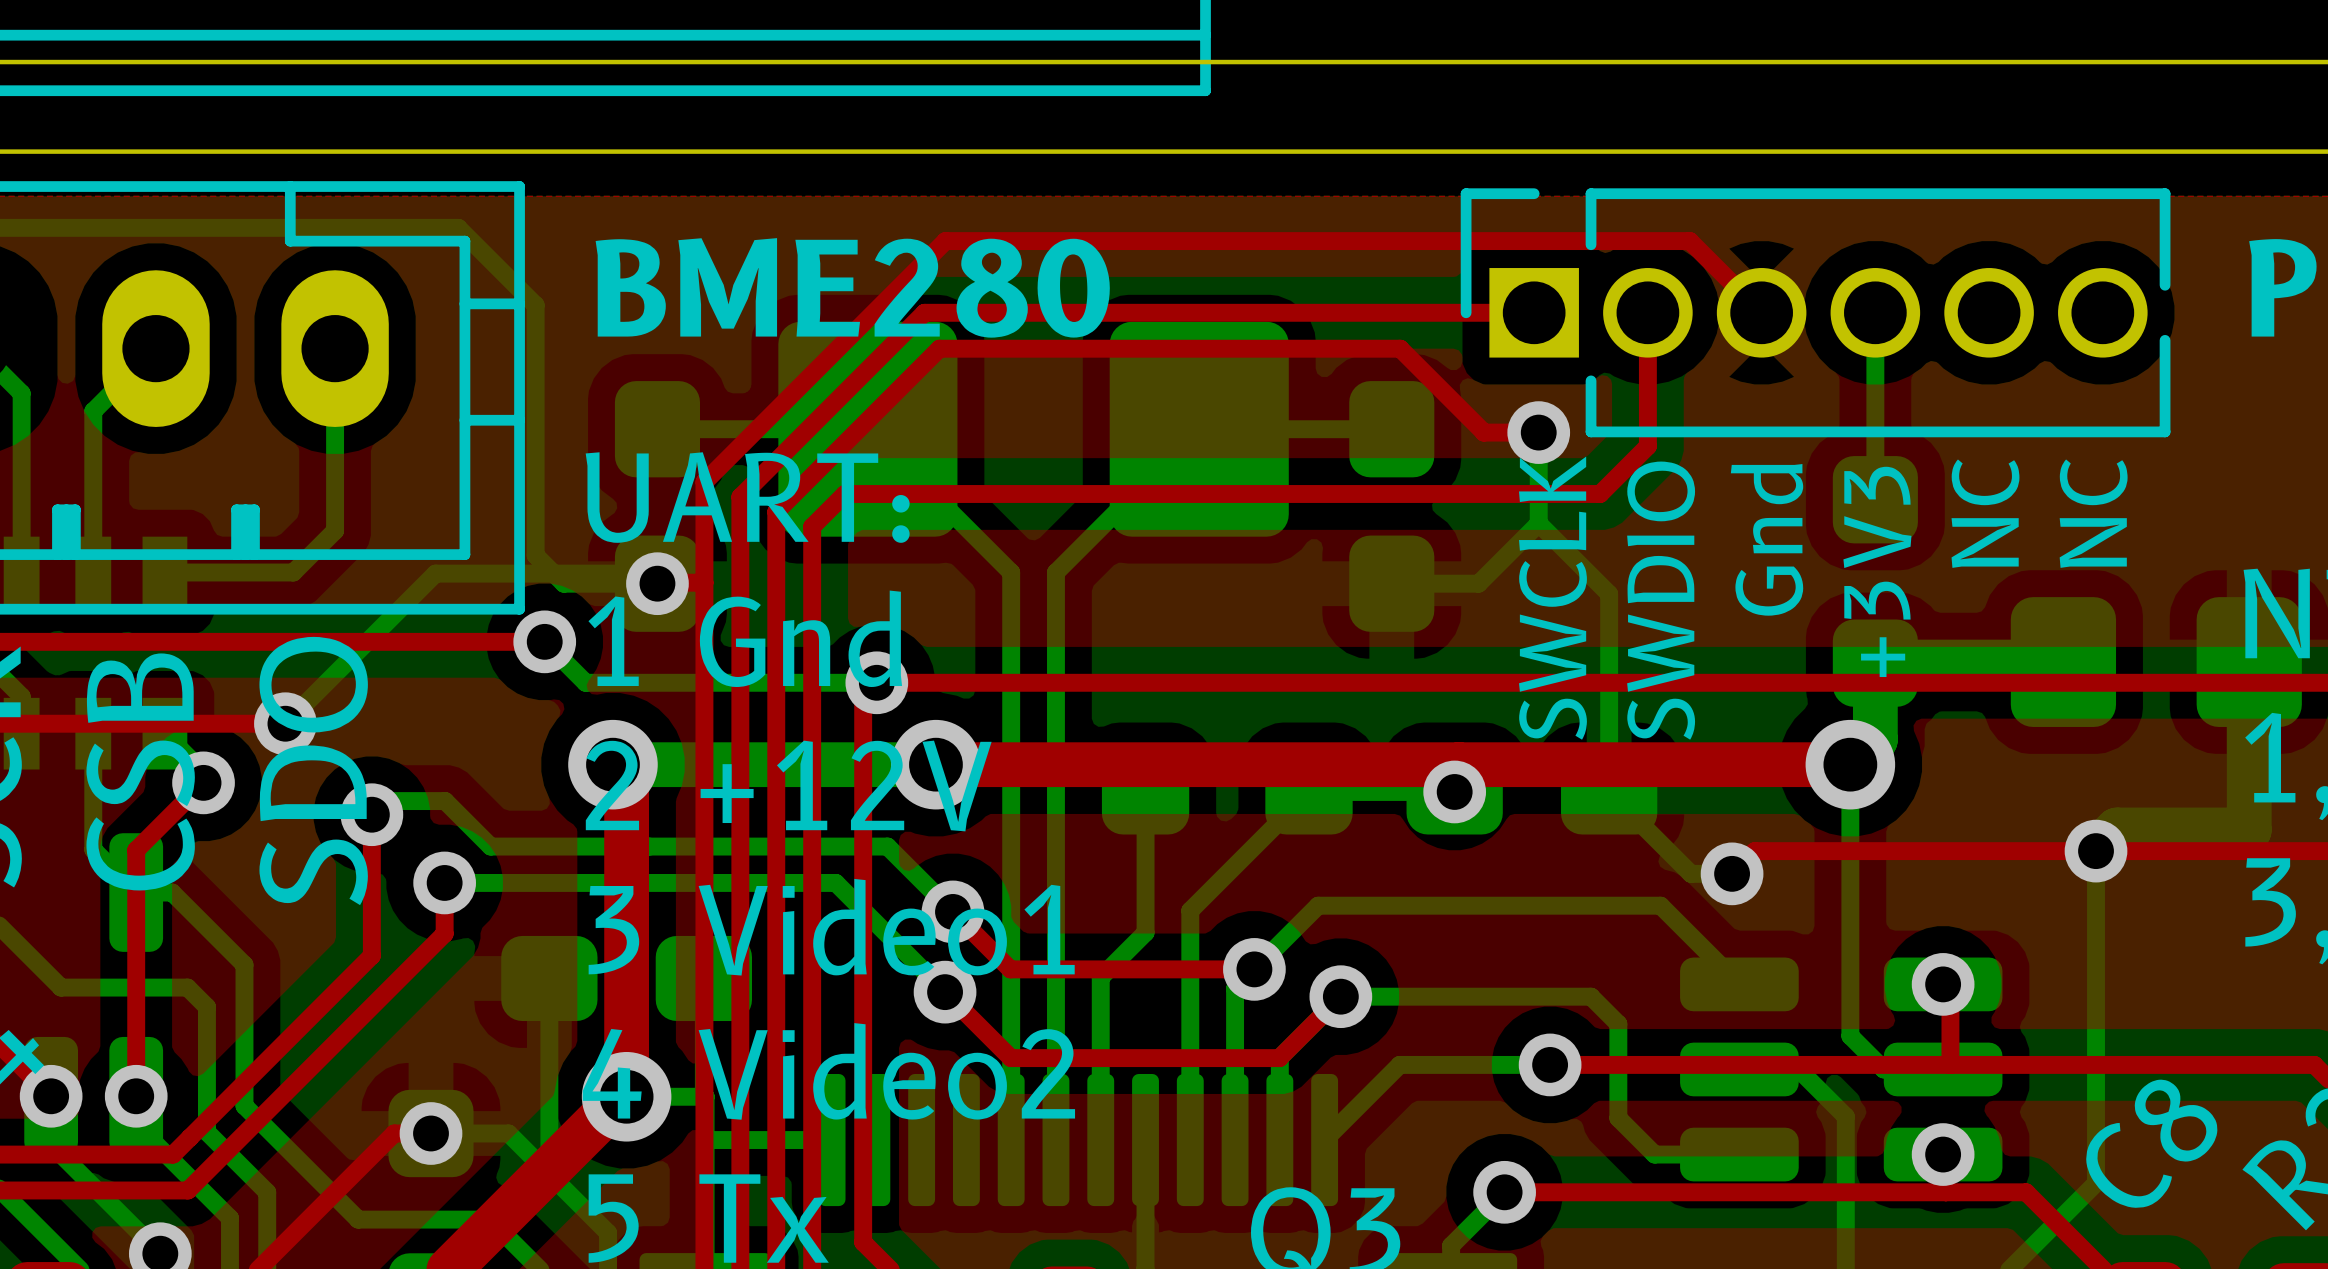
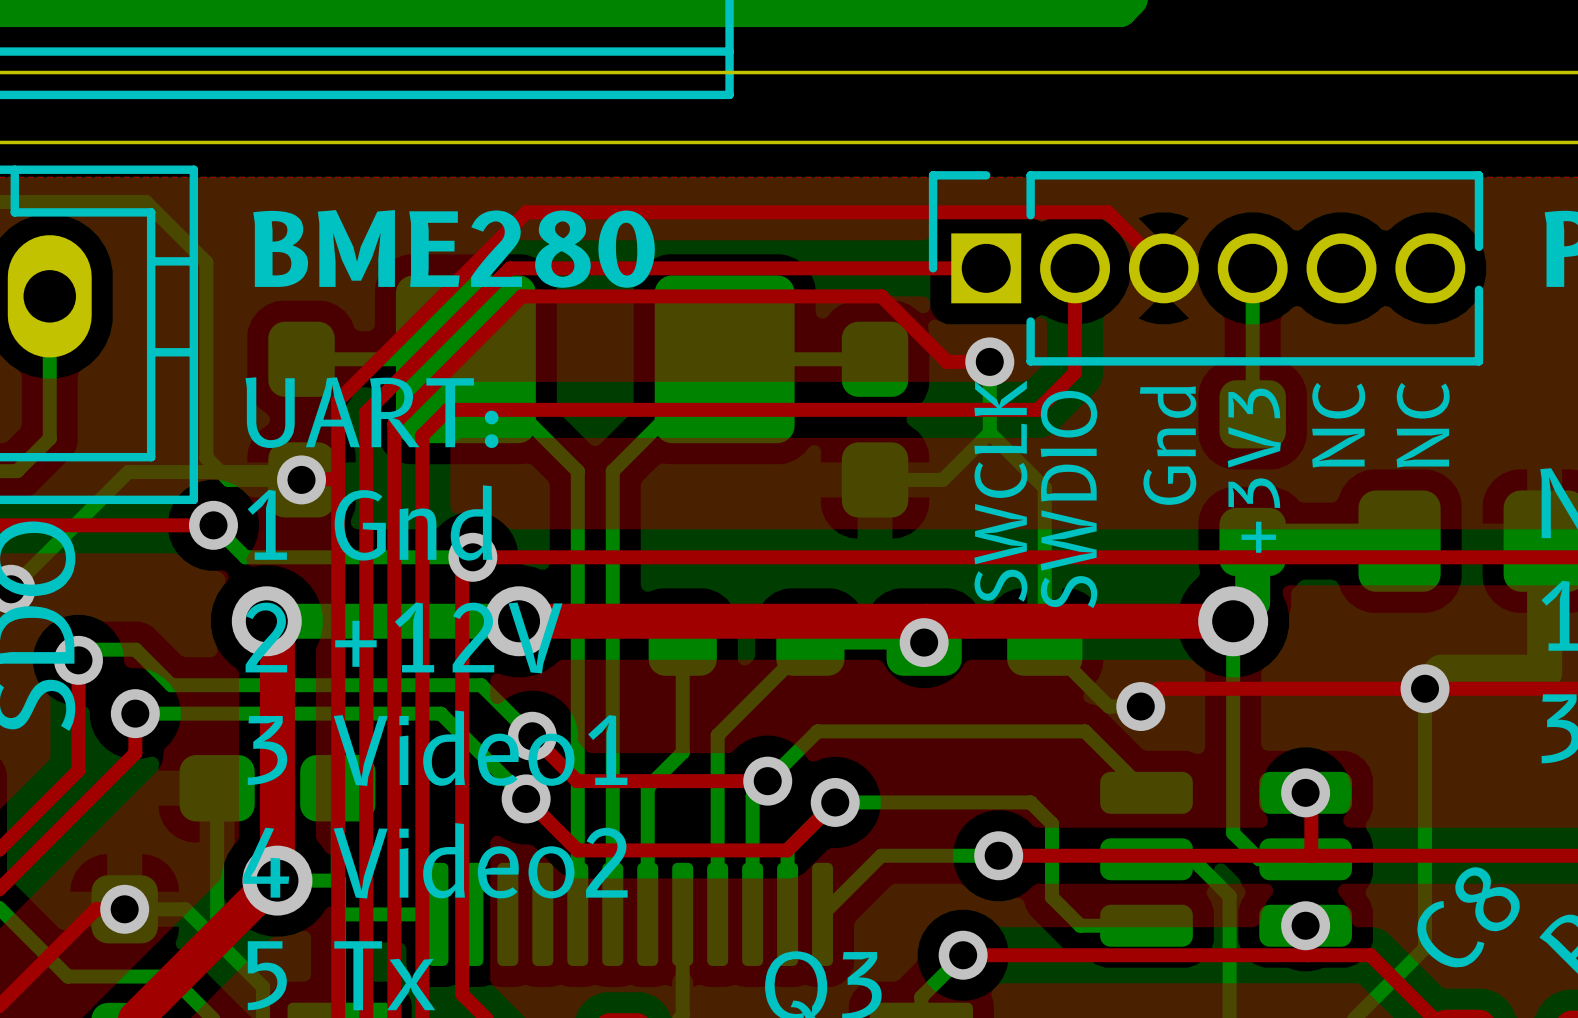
text position: SWDIO (1661, 600) -> SWDIO (1068, 499)

